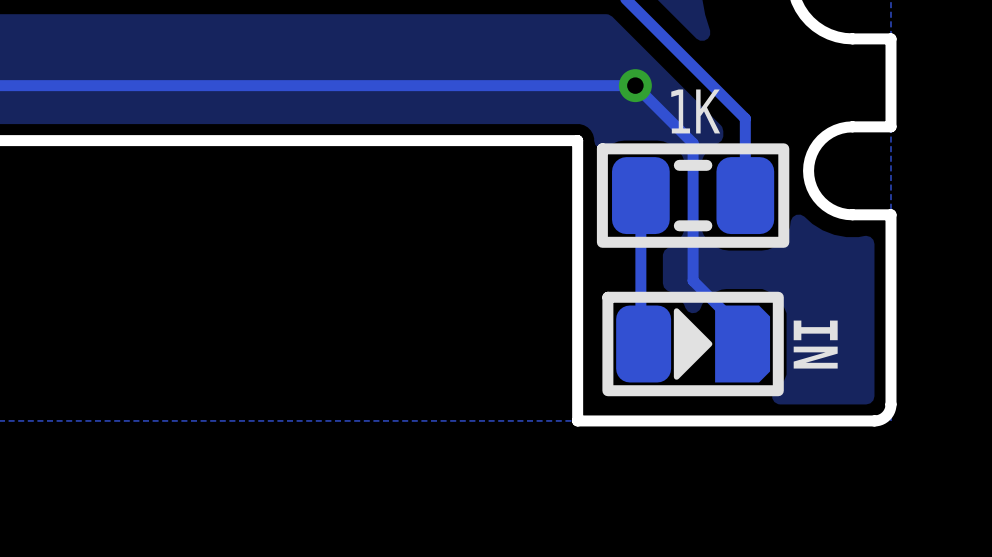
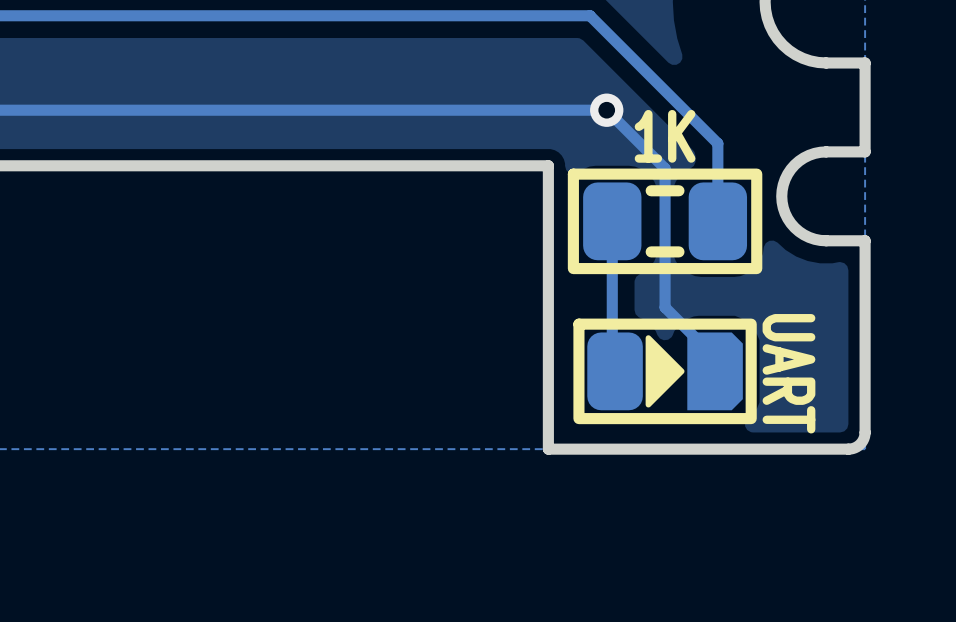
part value: IN (815, 344) -> UART (788, 373)

